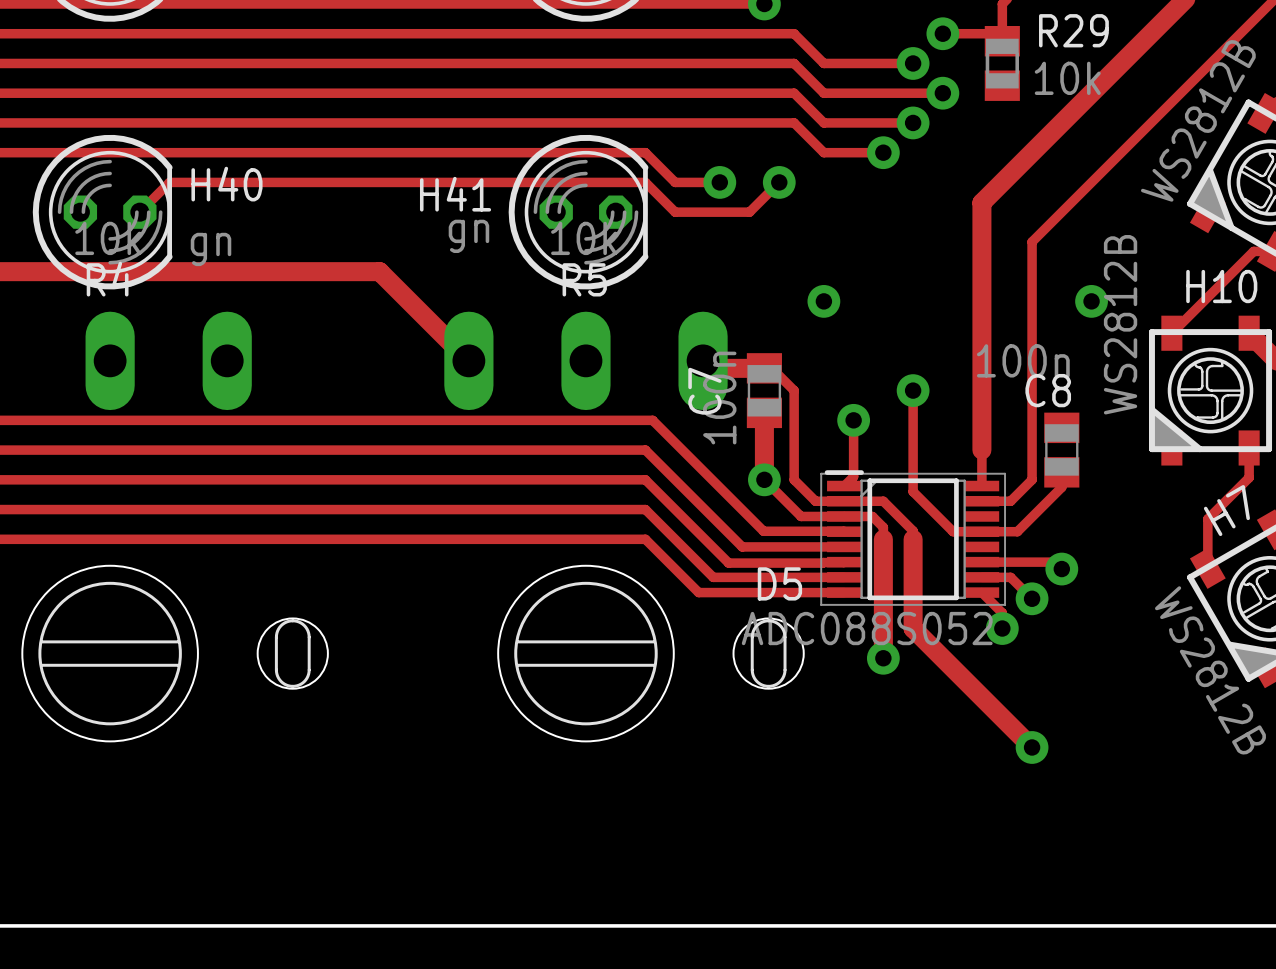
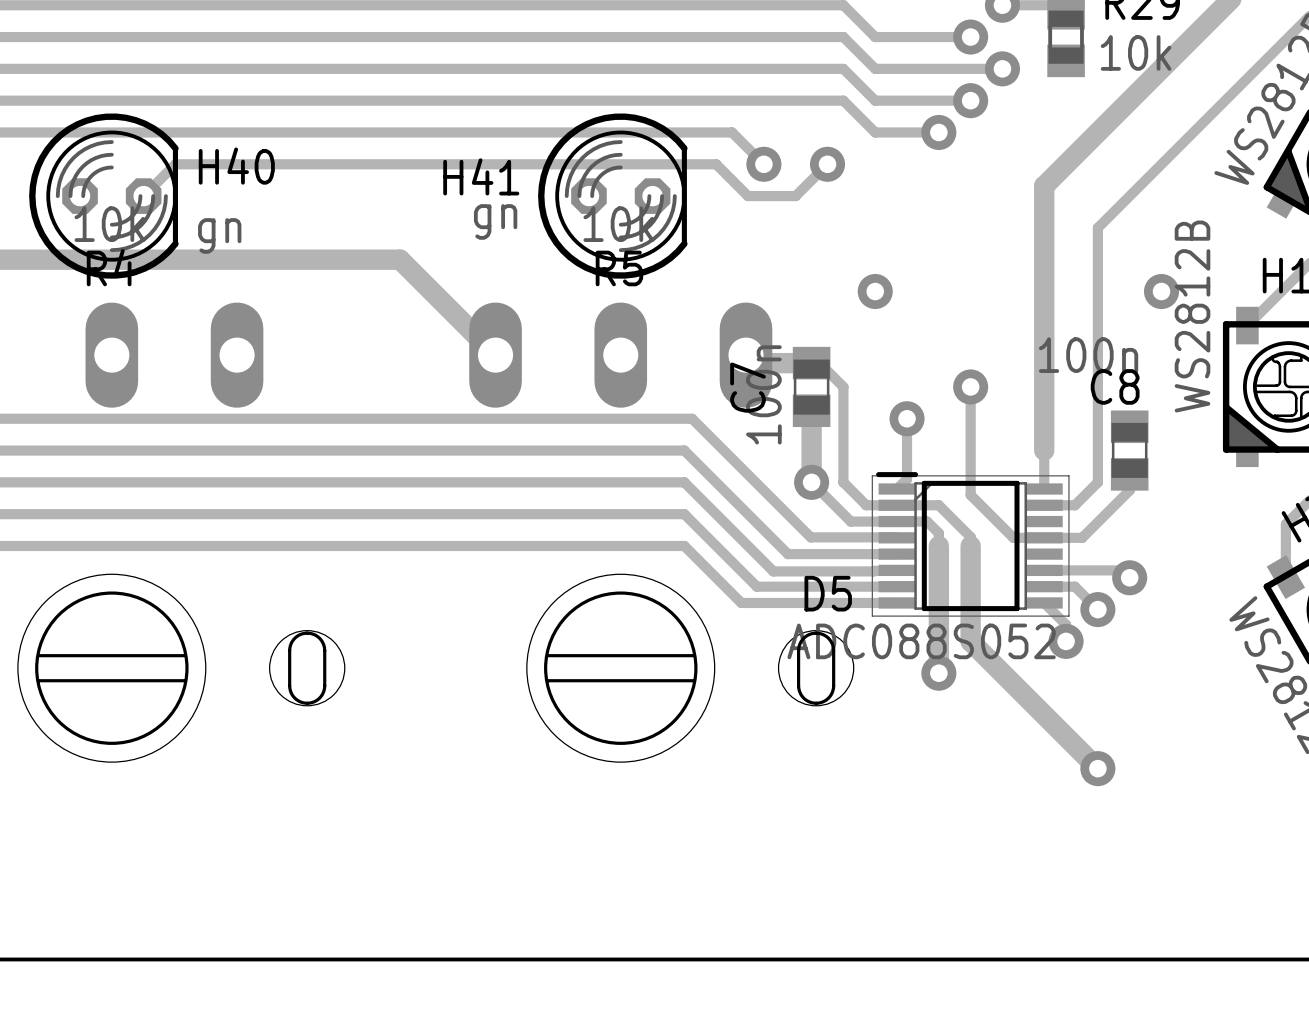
track: (645, 152) (675, 182) (719, 182) -> (684, 132) (732, 132) (763, 164)
track: (645, 182) (675, 212) (704, 212) -> (684, 164) (716, 164) (748, 196)

